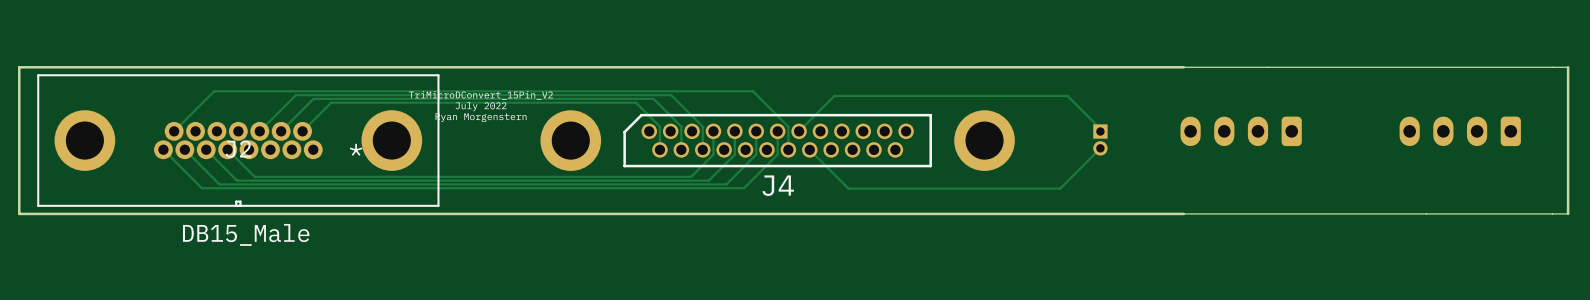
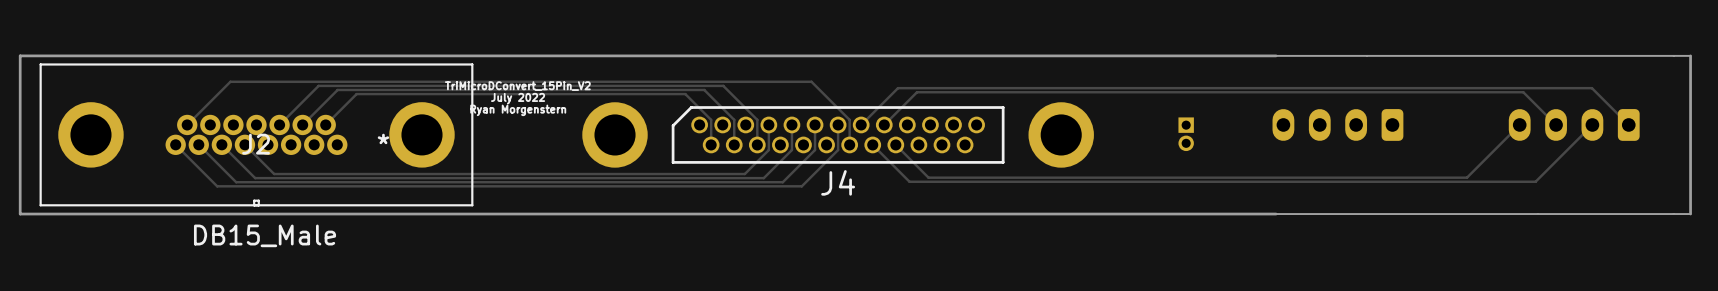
track: (833, 97) (1067, 95) (1100, 128) (1100, 131) -> (898, 88) (1591, 88) (1628, 124)
track: none -> (1519, 124) (1466, 177) (928, 177) (895, 144)
track: none -> (1556, 124) (1523, 92) (916, 92) (884, 124)
track: (1100, 148) (1060, 188) (848, 188) (843, 184) -> (1592, 124) (1535, 181) (909, 181)

